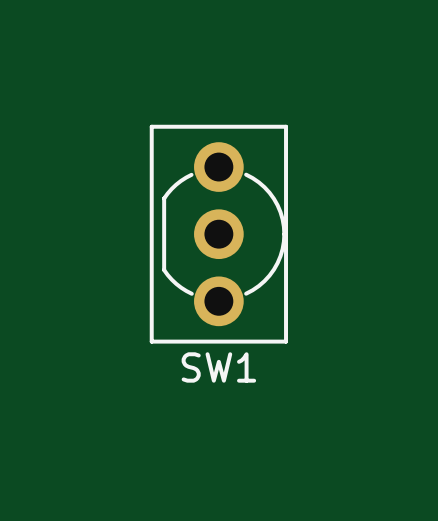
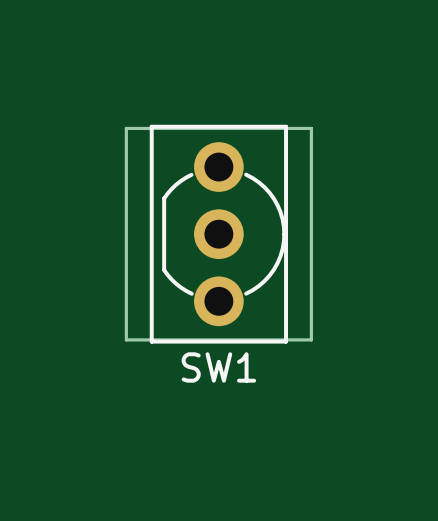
SW1 footprint: [149, 124, 288, 344] -> [124, 124, 313, 344]

